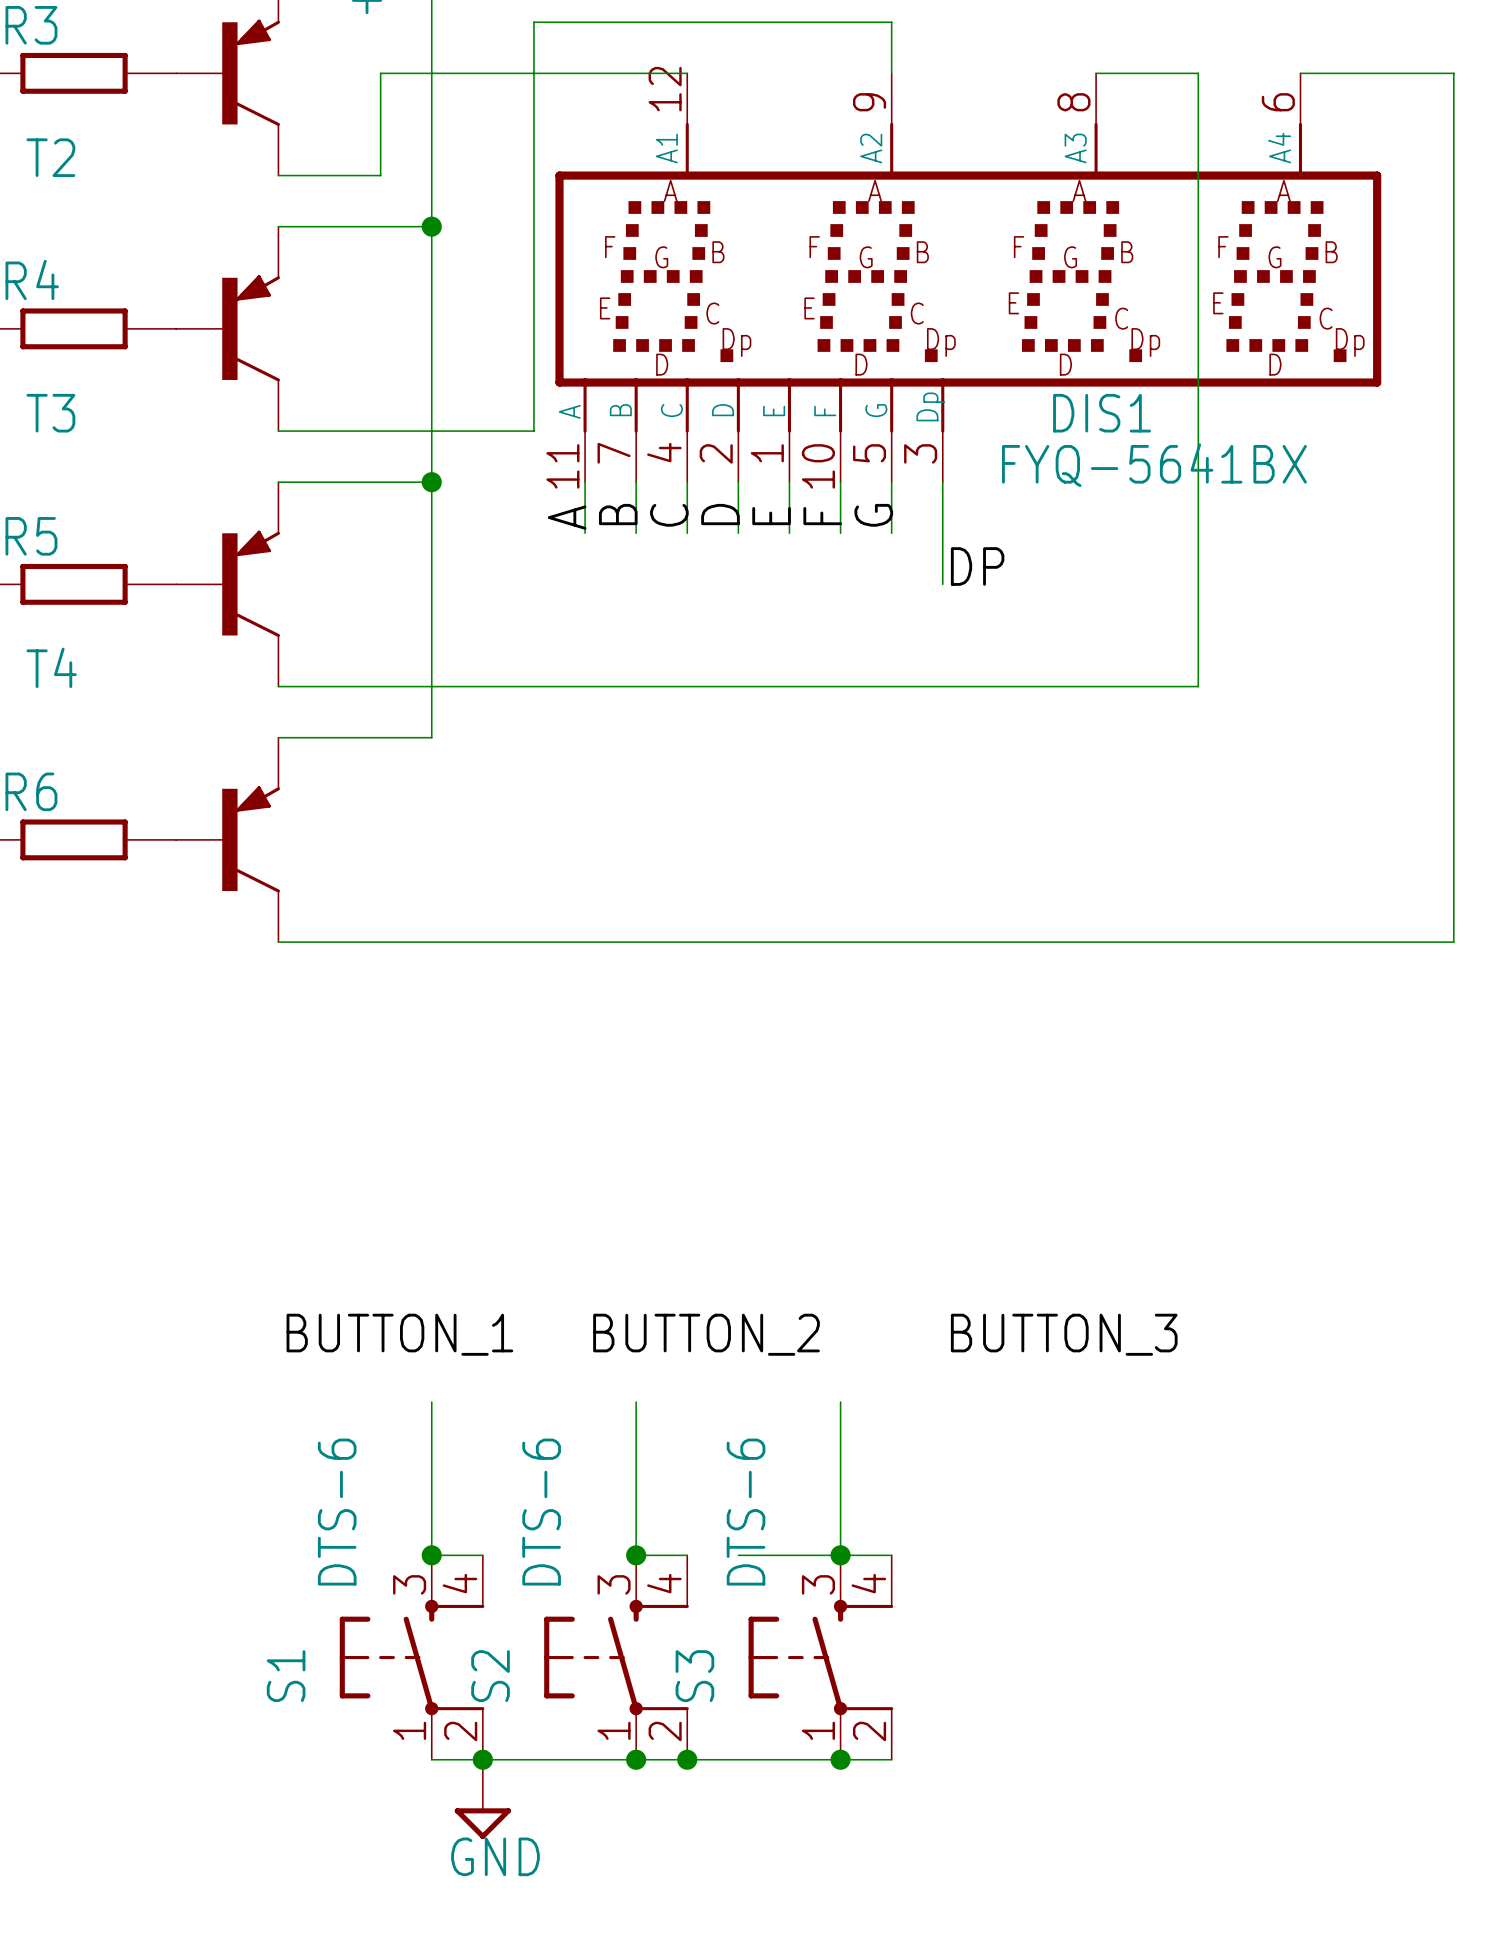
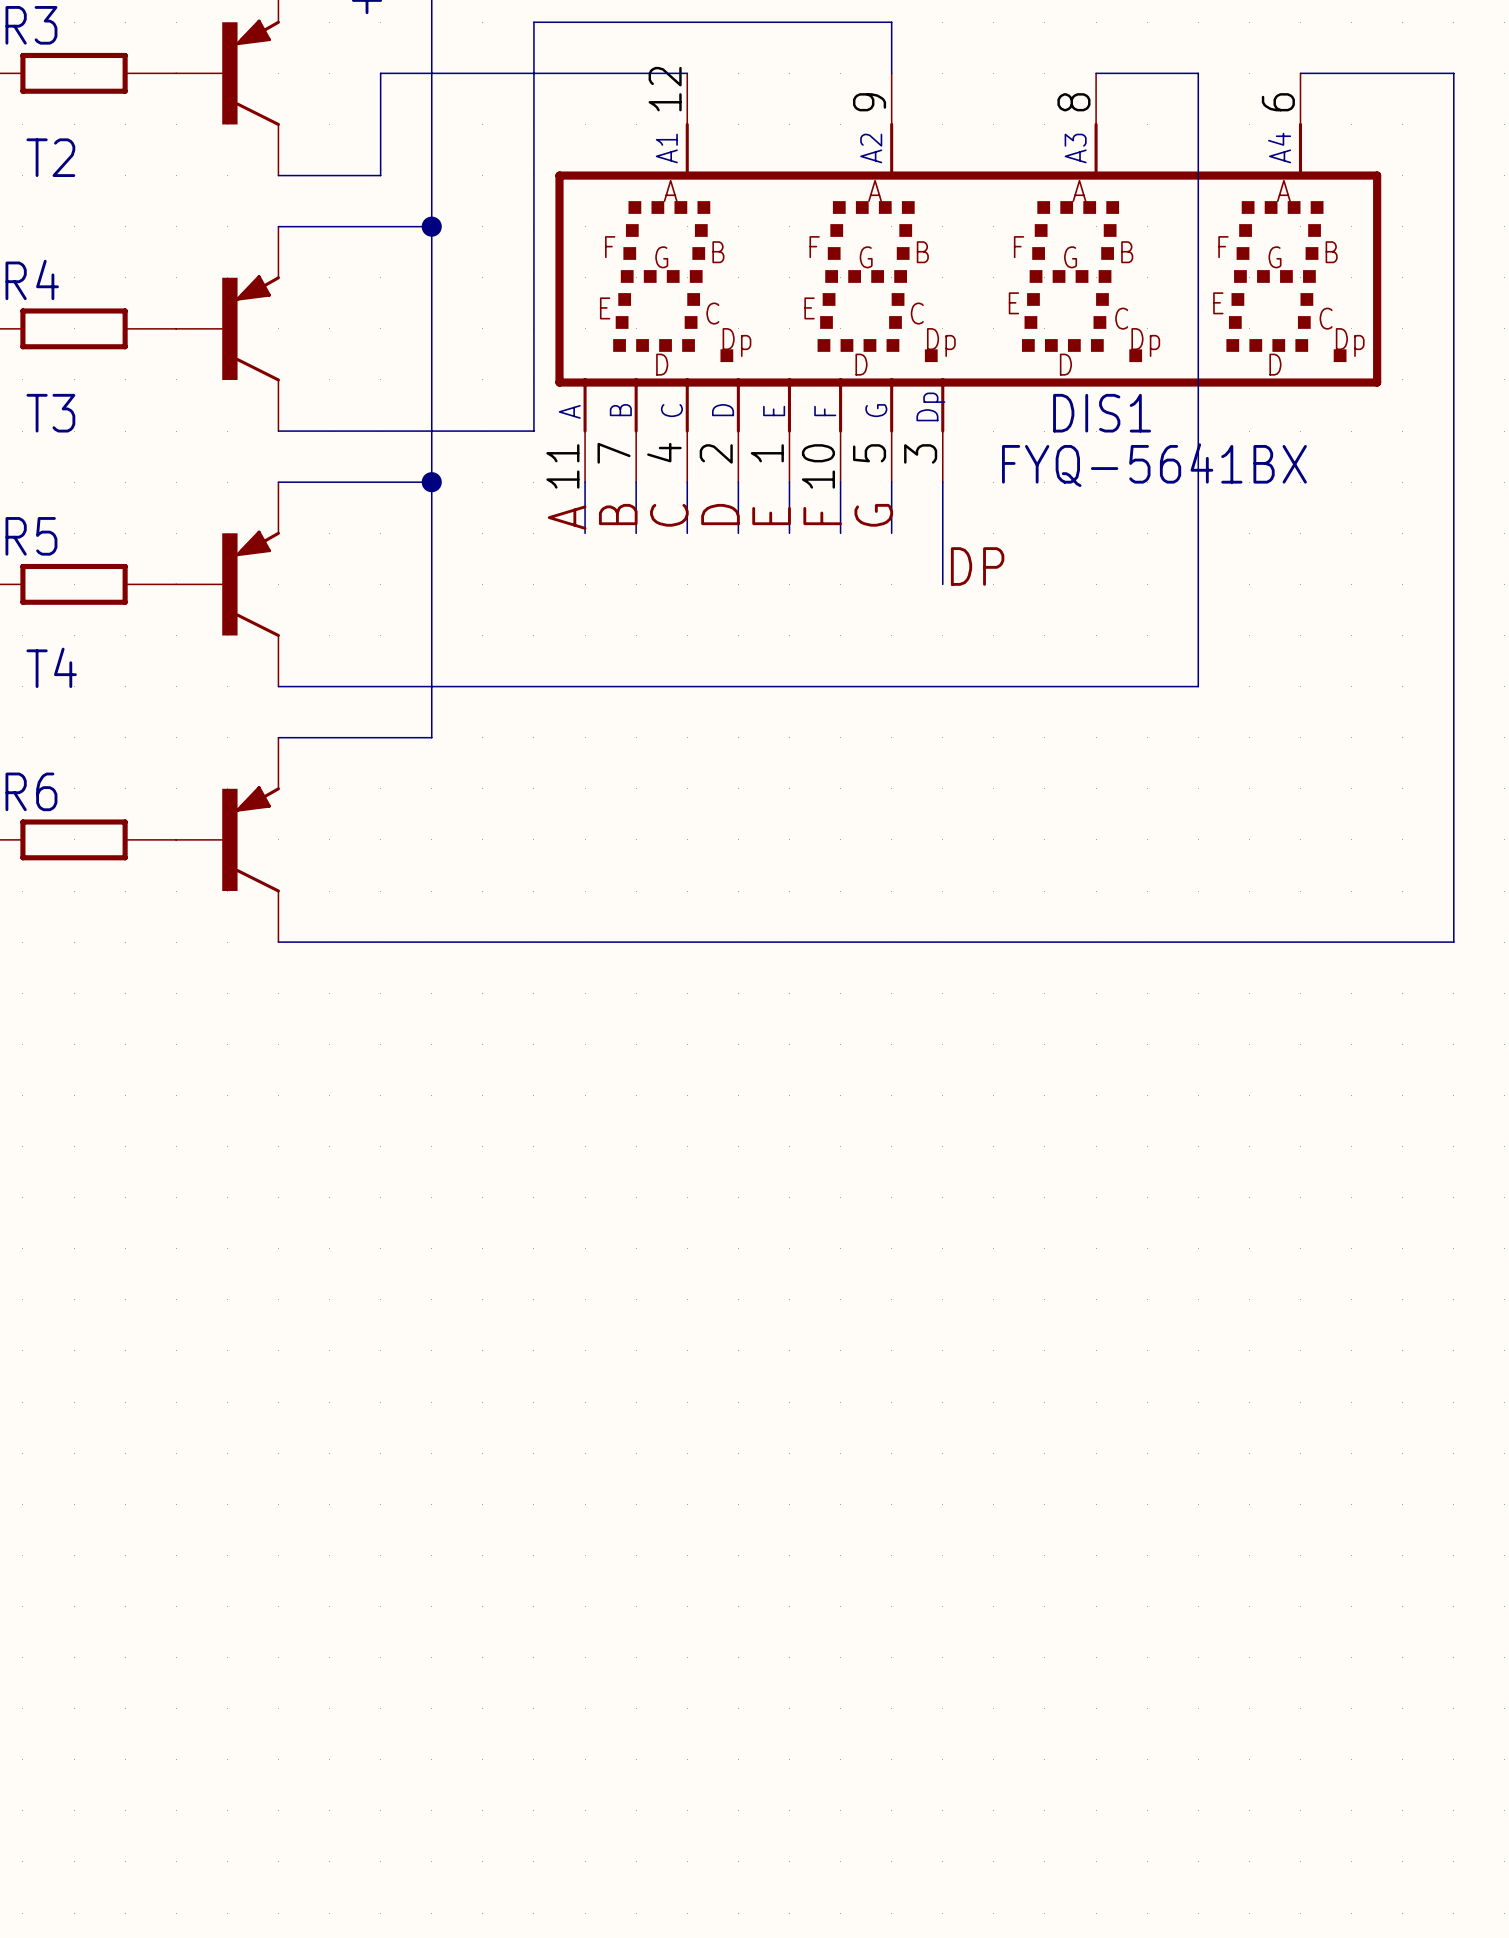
label: BUTTON_1 (399, 1334) -> none
label: BUTTON_2 (706, 1334) -> none
label: BUTTON_3 (1064, 1334) -> none
wire: (431, 1402) (431, 1555) (482, 1555) -> none
wire: (636, 1402) (636, 1555) (687, 1555) -> none
wire: (840, 1402) (840, 1555) -> none
junction: (431, 1555) -> none
junction: (636, 1555) -> none
wire: (738, 1555) (891, 1555) -> none
junction: (840, 1555) -> none
S1: DTS-6 (412, 1657) -> none
S2: DTS-6 (616, 1657) -> none
S3: DTS-6 (820, 1657) -> none
wire: (431, 1759) (891, 1759) -> none
junction: (482, 1759) -> none
junction: (636, 1759) -> none
junction: (687, 1759) -> none
junction: (840, 1759) -> none
power symbol: GND (482, 1799) -> none

